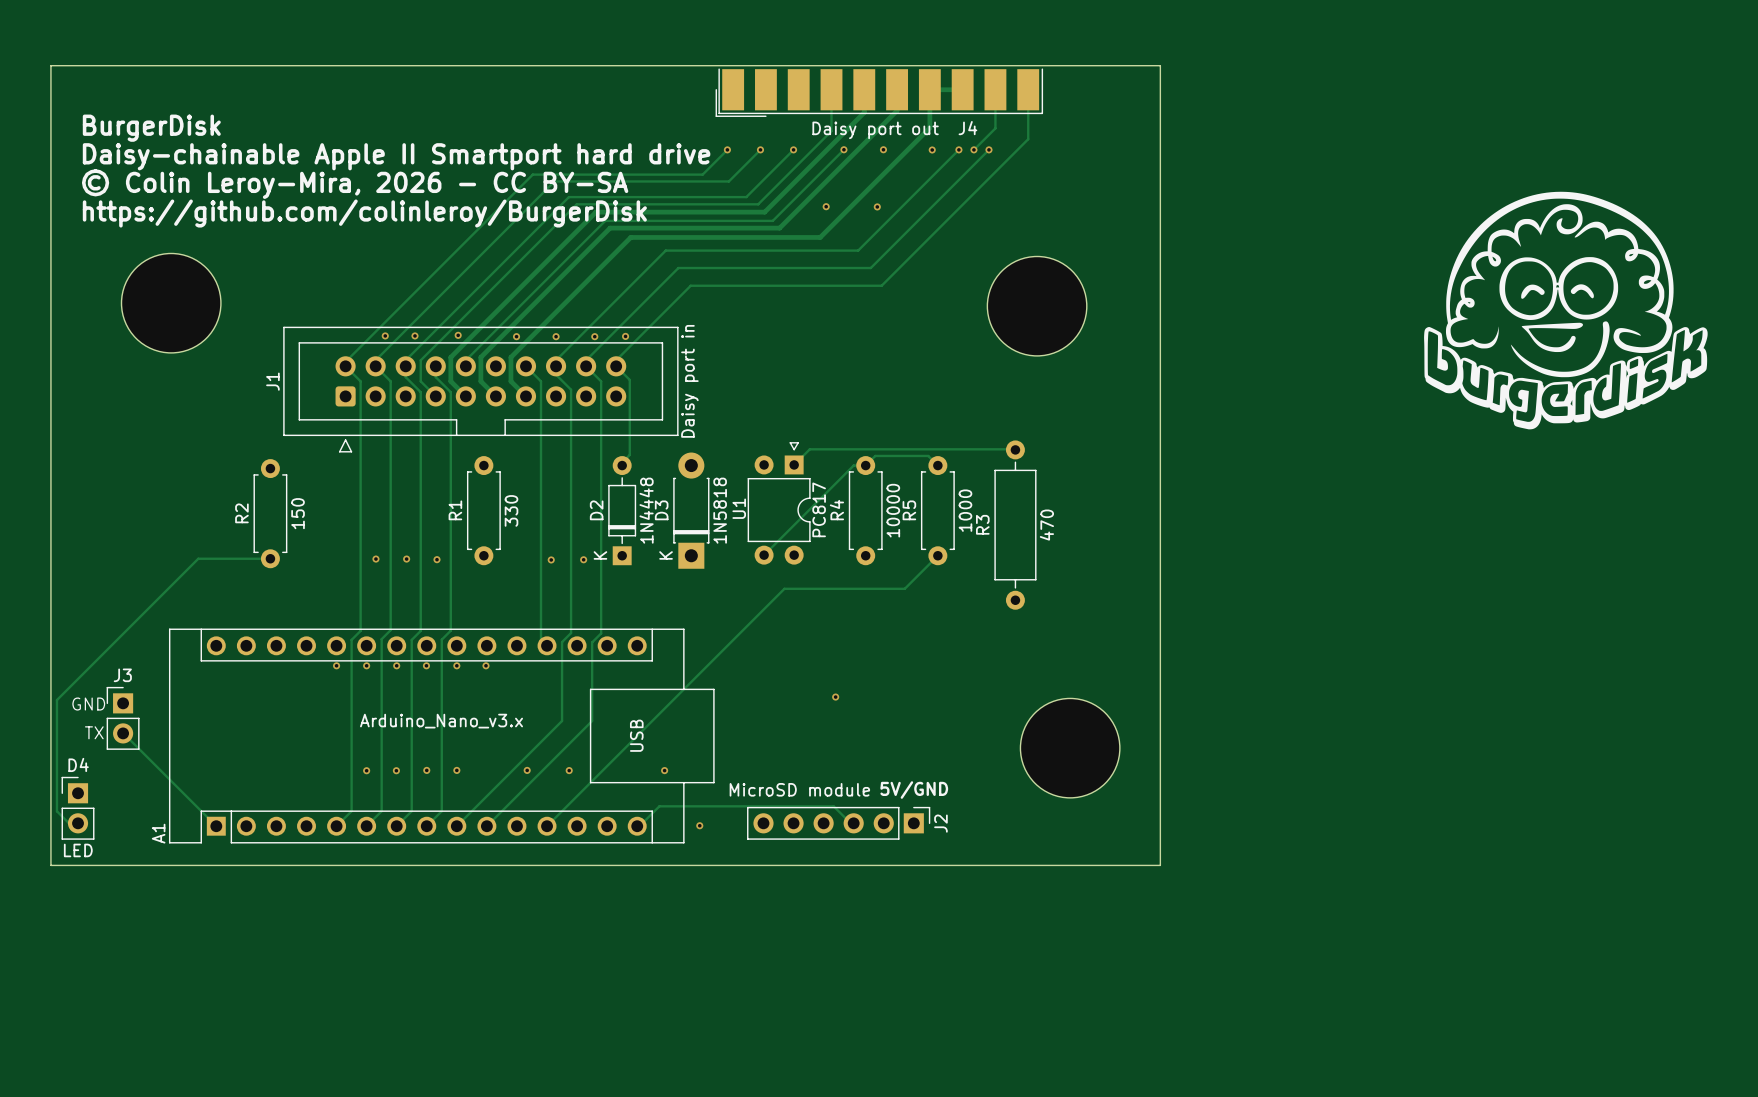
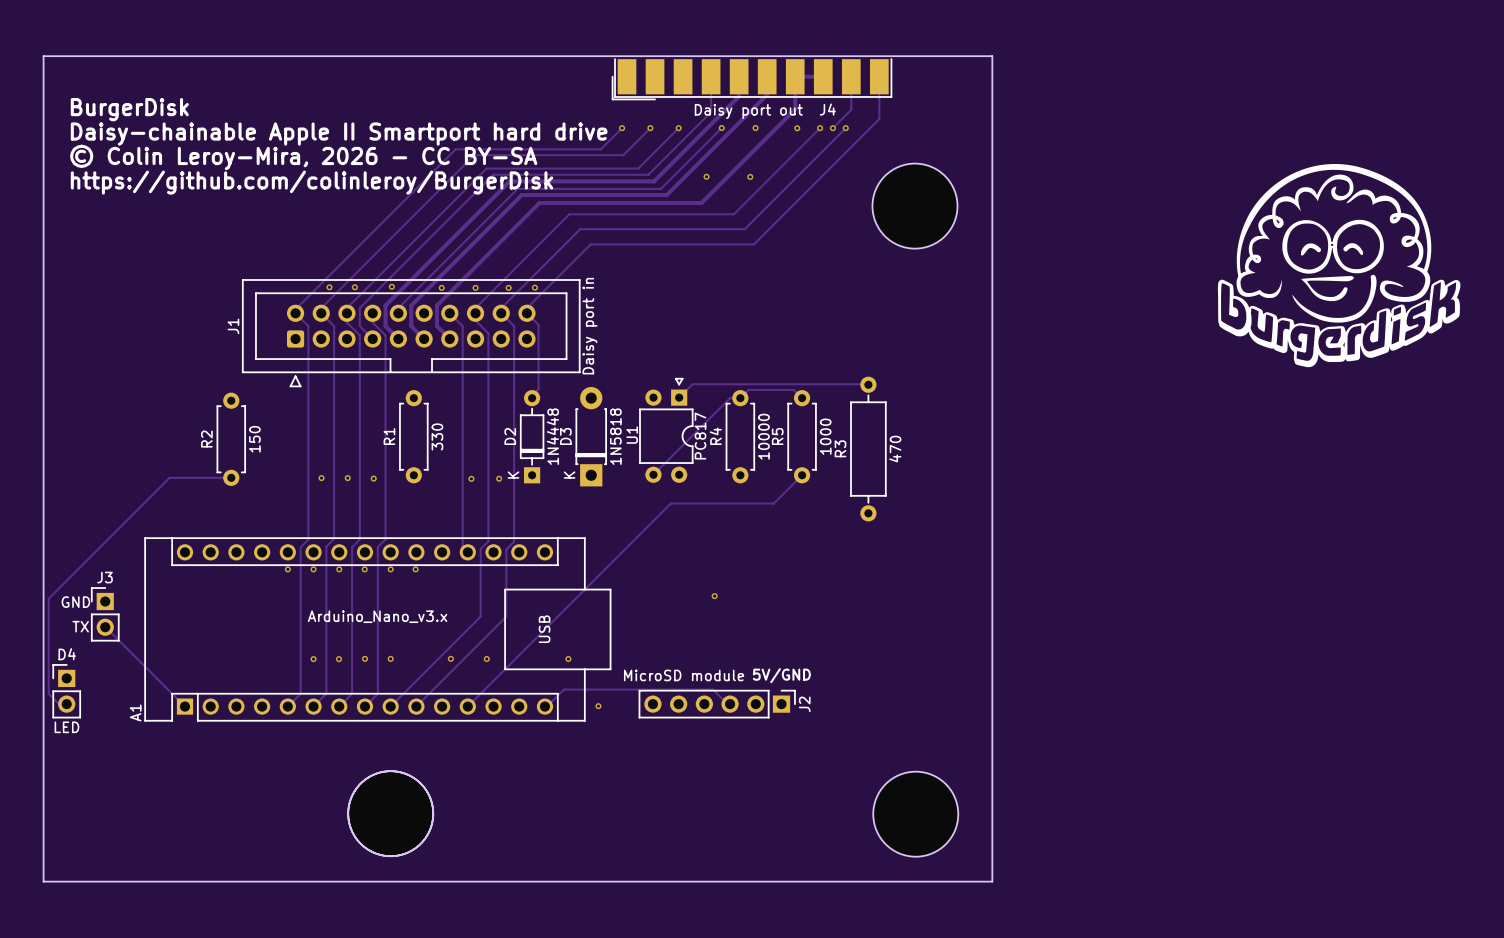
part: (171, 303) -> none
part position: (1037, 306) -> (914, 206)
part position: (1070, 748) -> (915, 814)
board edge: (50, 865) (1160, 865) -> (43, 740) (43, 881) (992, 881) (992, 740)
part: none -> (390, 813)

